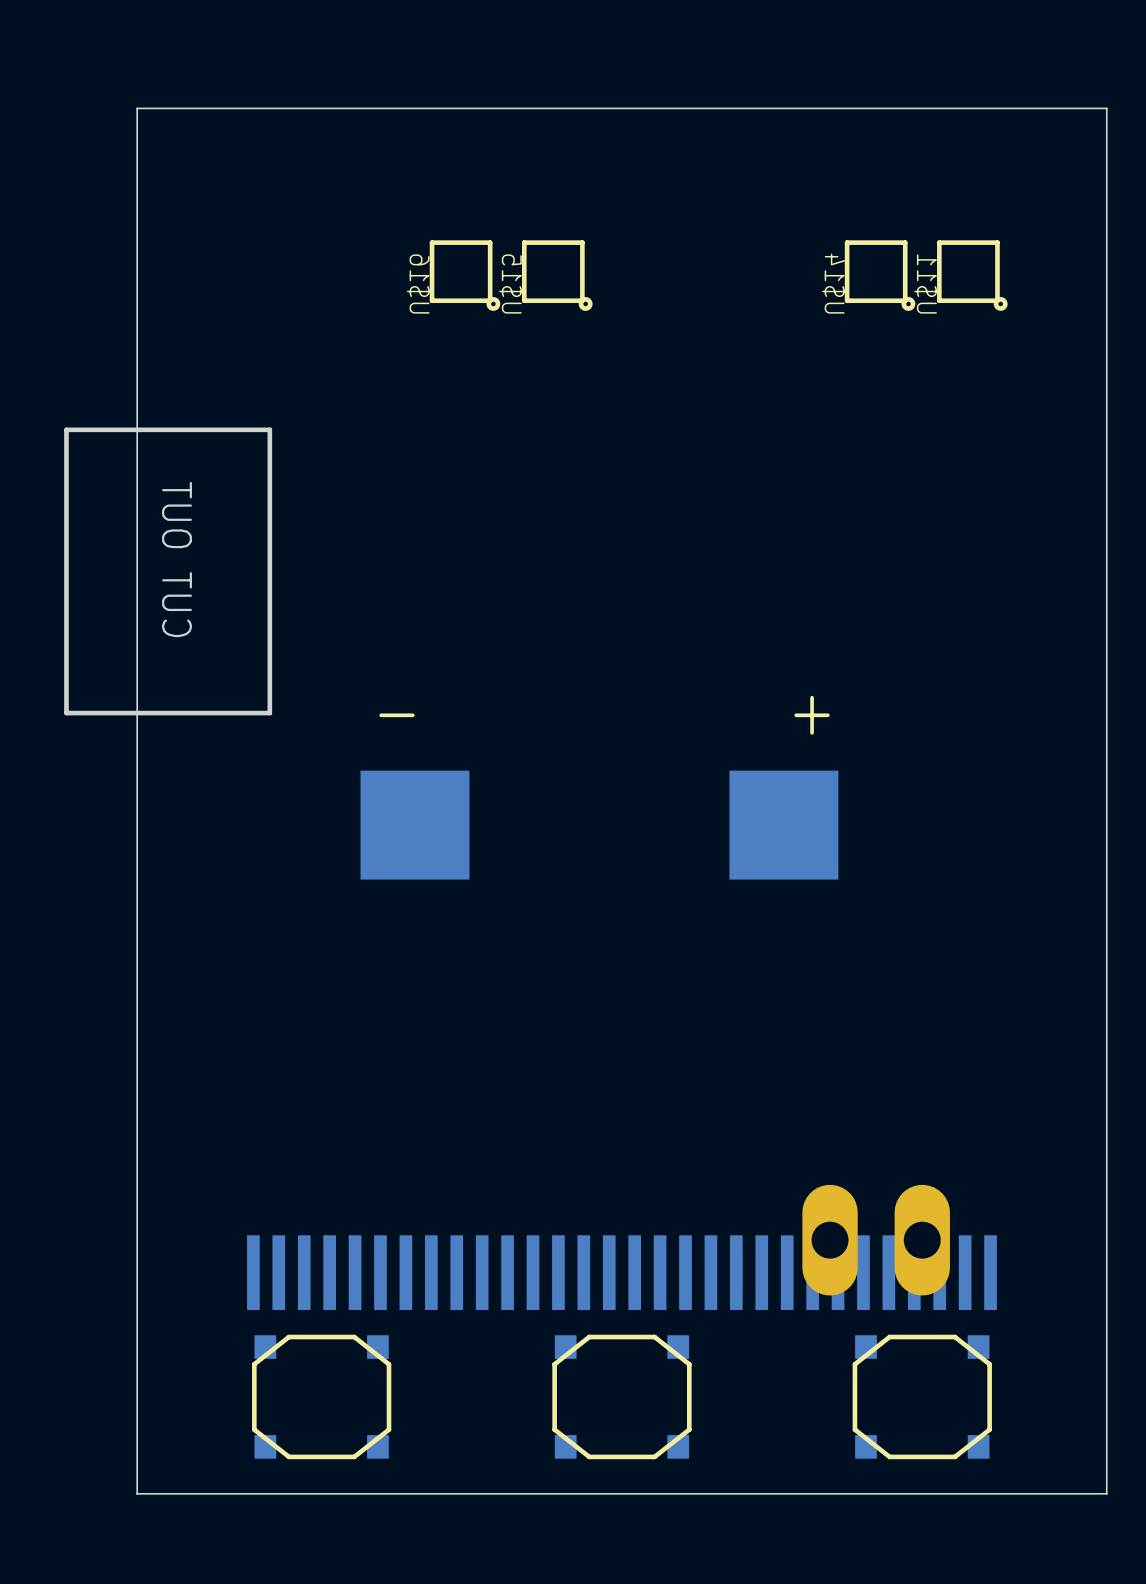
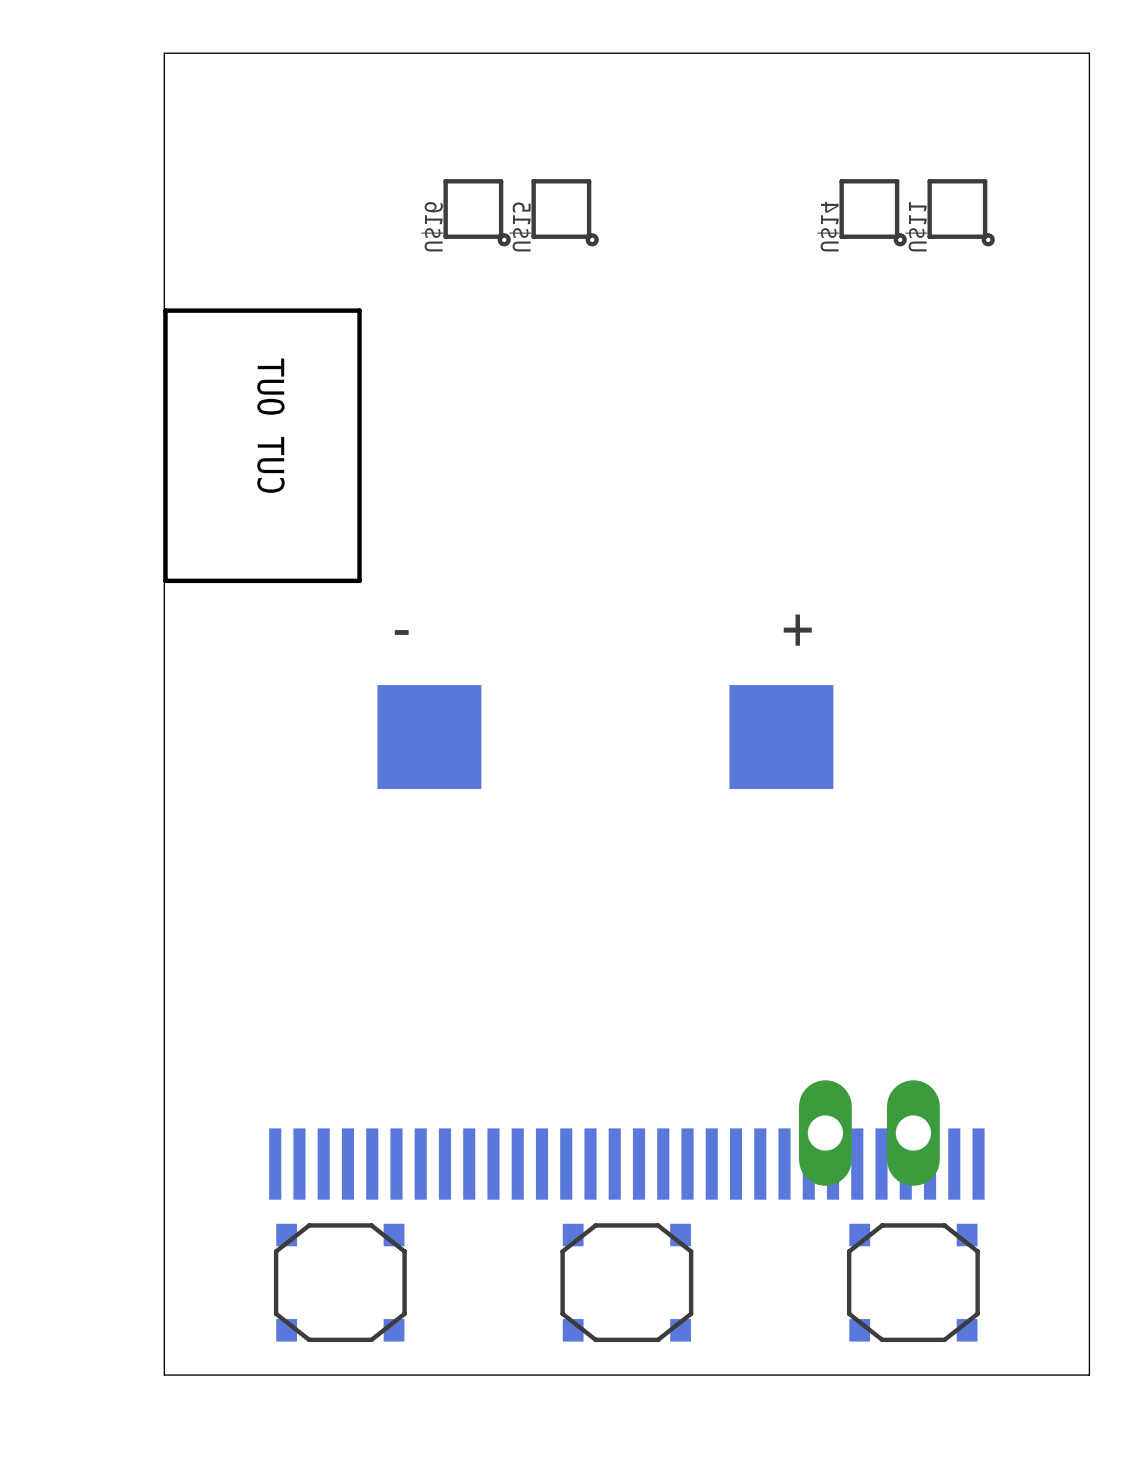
part position: (168, 571) -> (262, 445)

